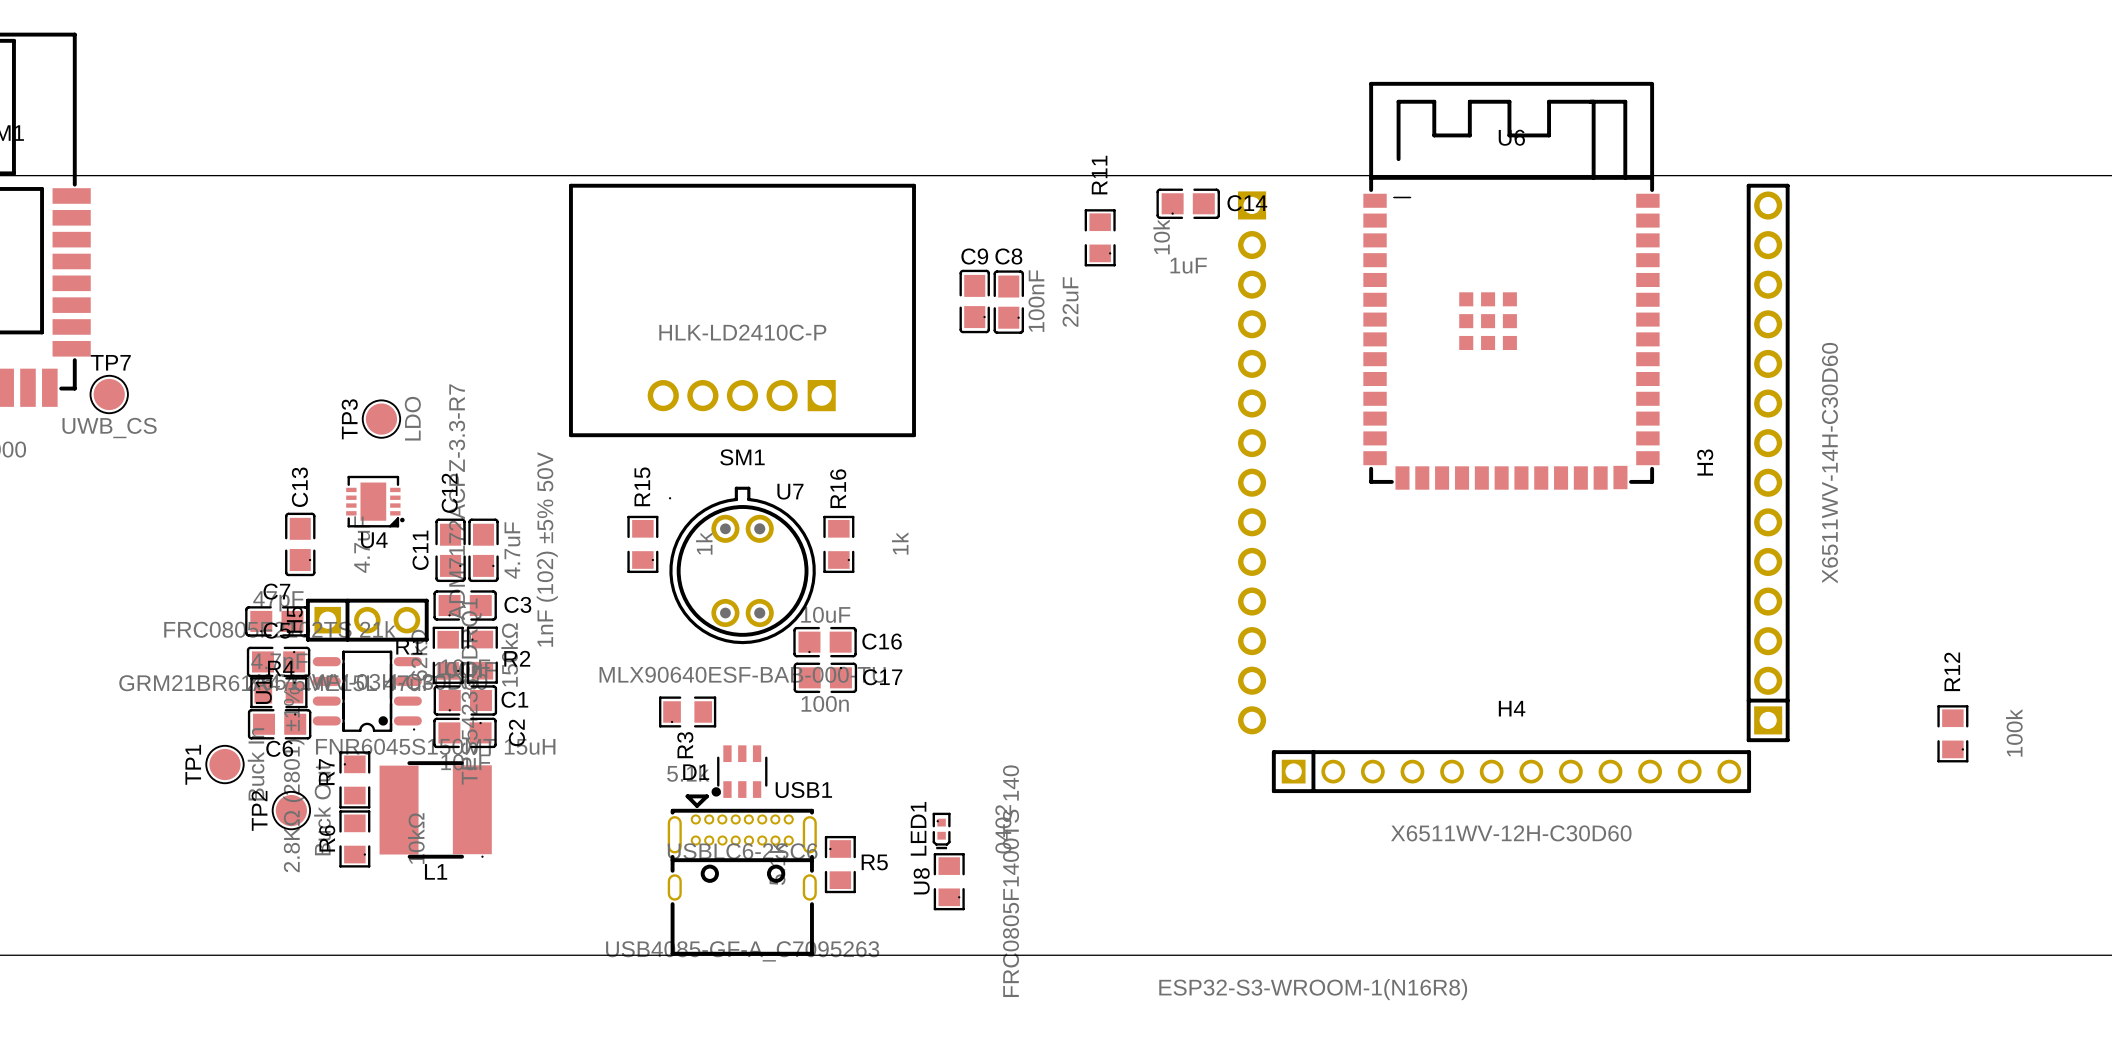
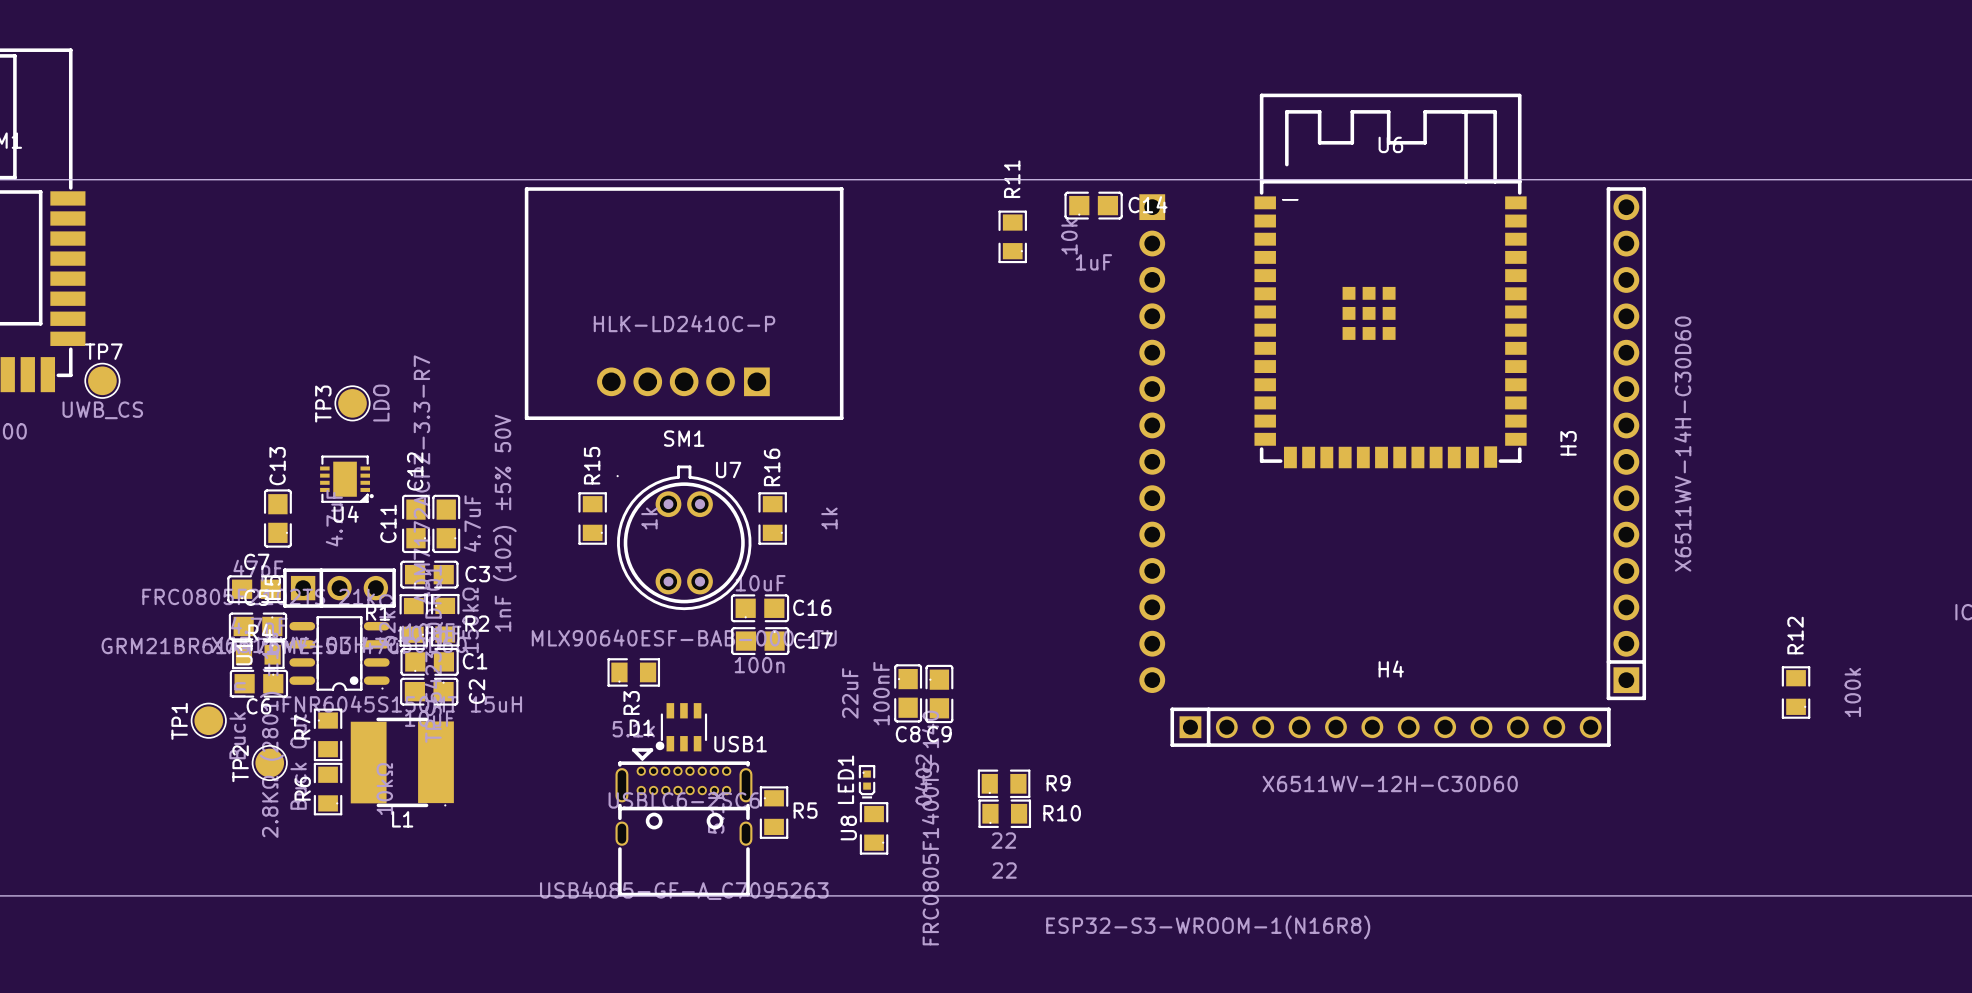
C9 rotation: 0° (974, 301) -> 180° (939, 693)
C9 position: (974, 301) -> (939, 693)
C8 rotation: 0° (1008, 302) -> 180° (908, 693)
C8 position: (1008, 302) -> (908, 693)
R9: none -> 22 (1004, 783)
R10: none -> 22 (1004, 813)

